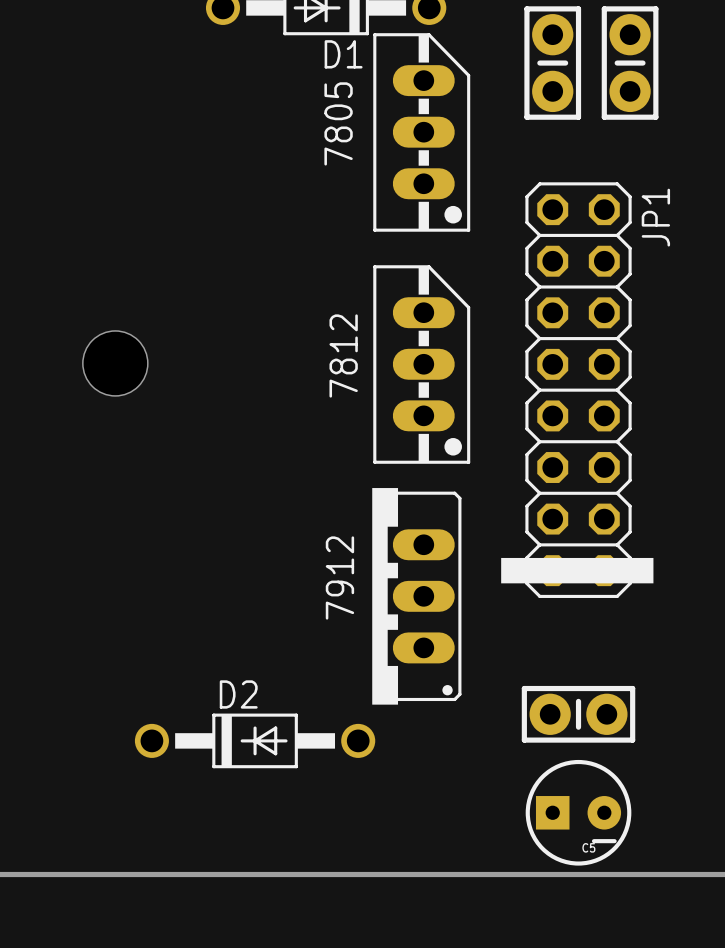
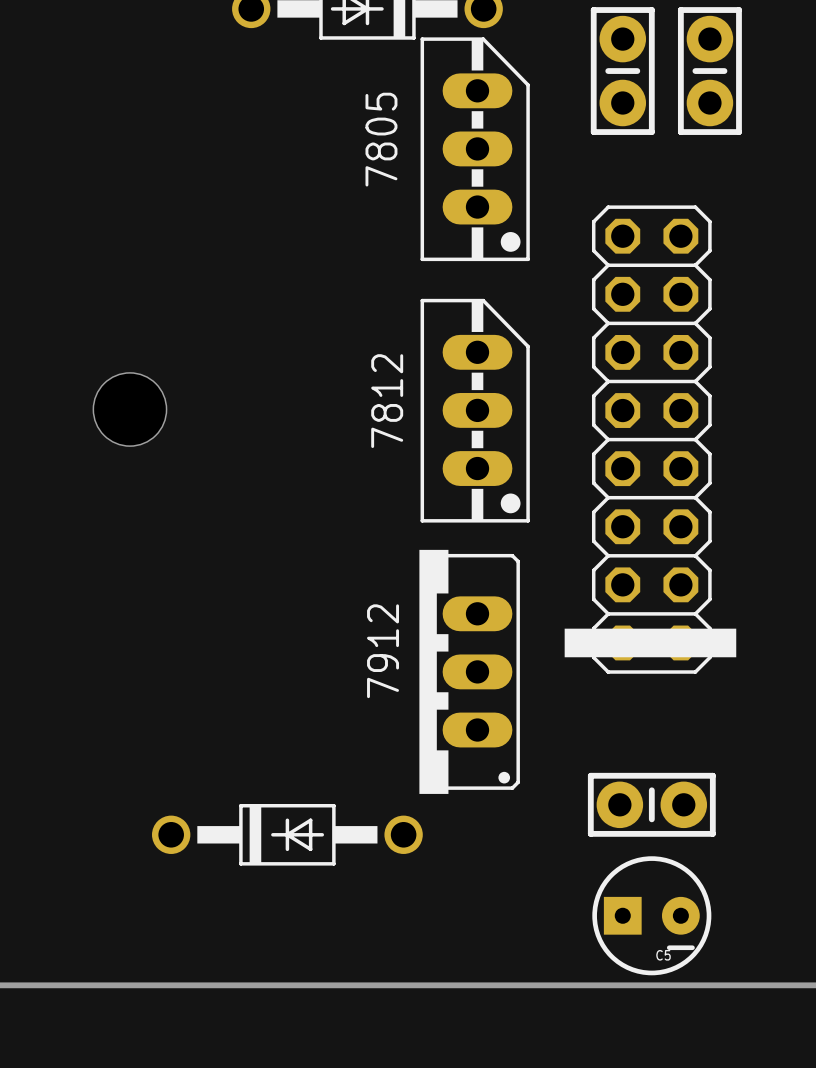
D1 name: D1 (343, 54) -> none
JP1 name: JP1 (655, 217) -> none
D2 name: D2 (238, 694) -> none

